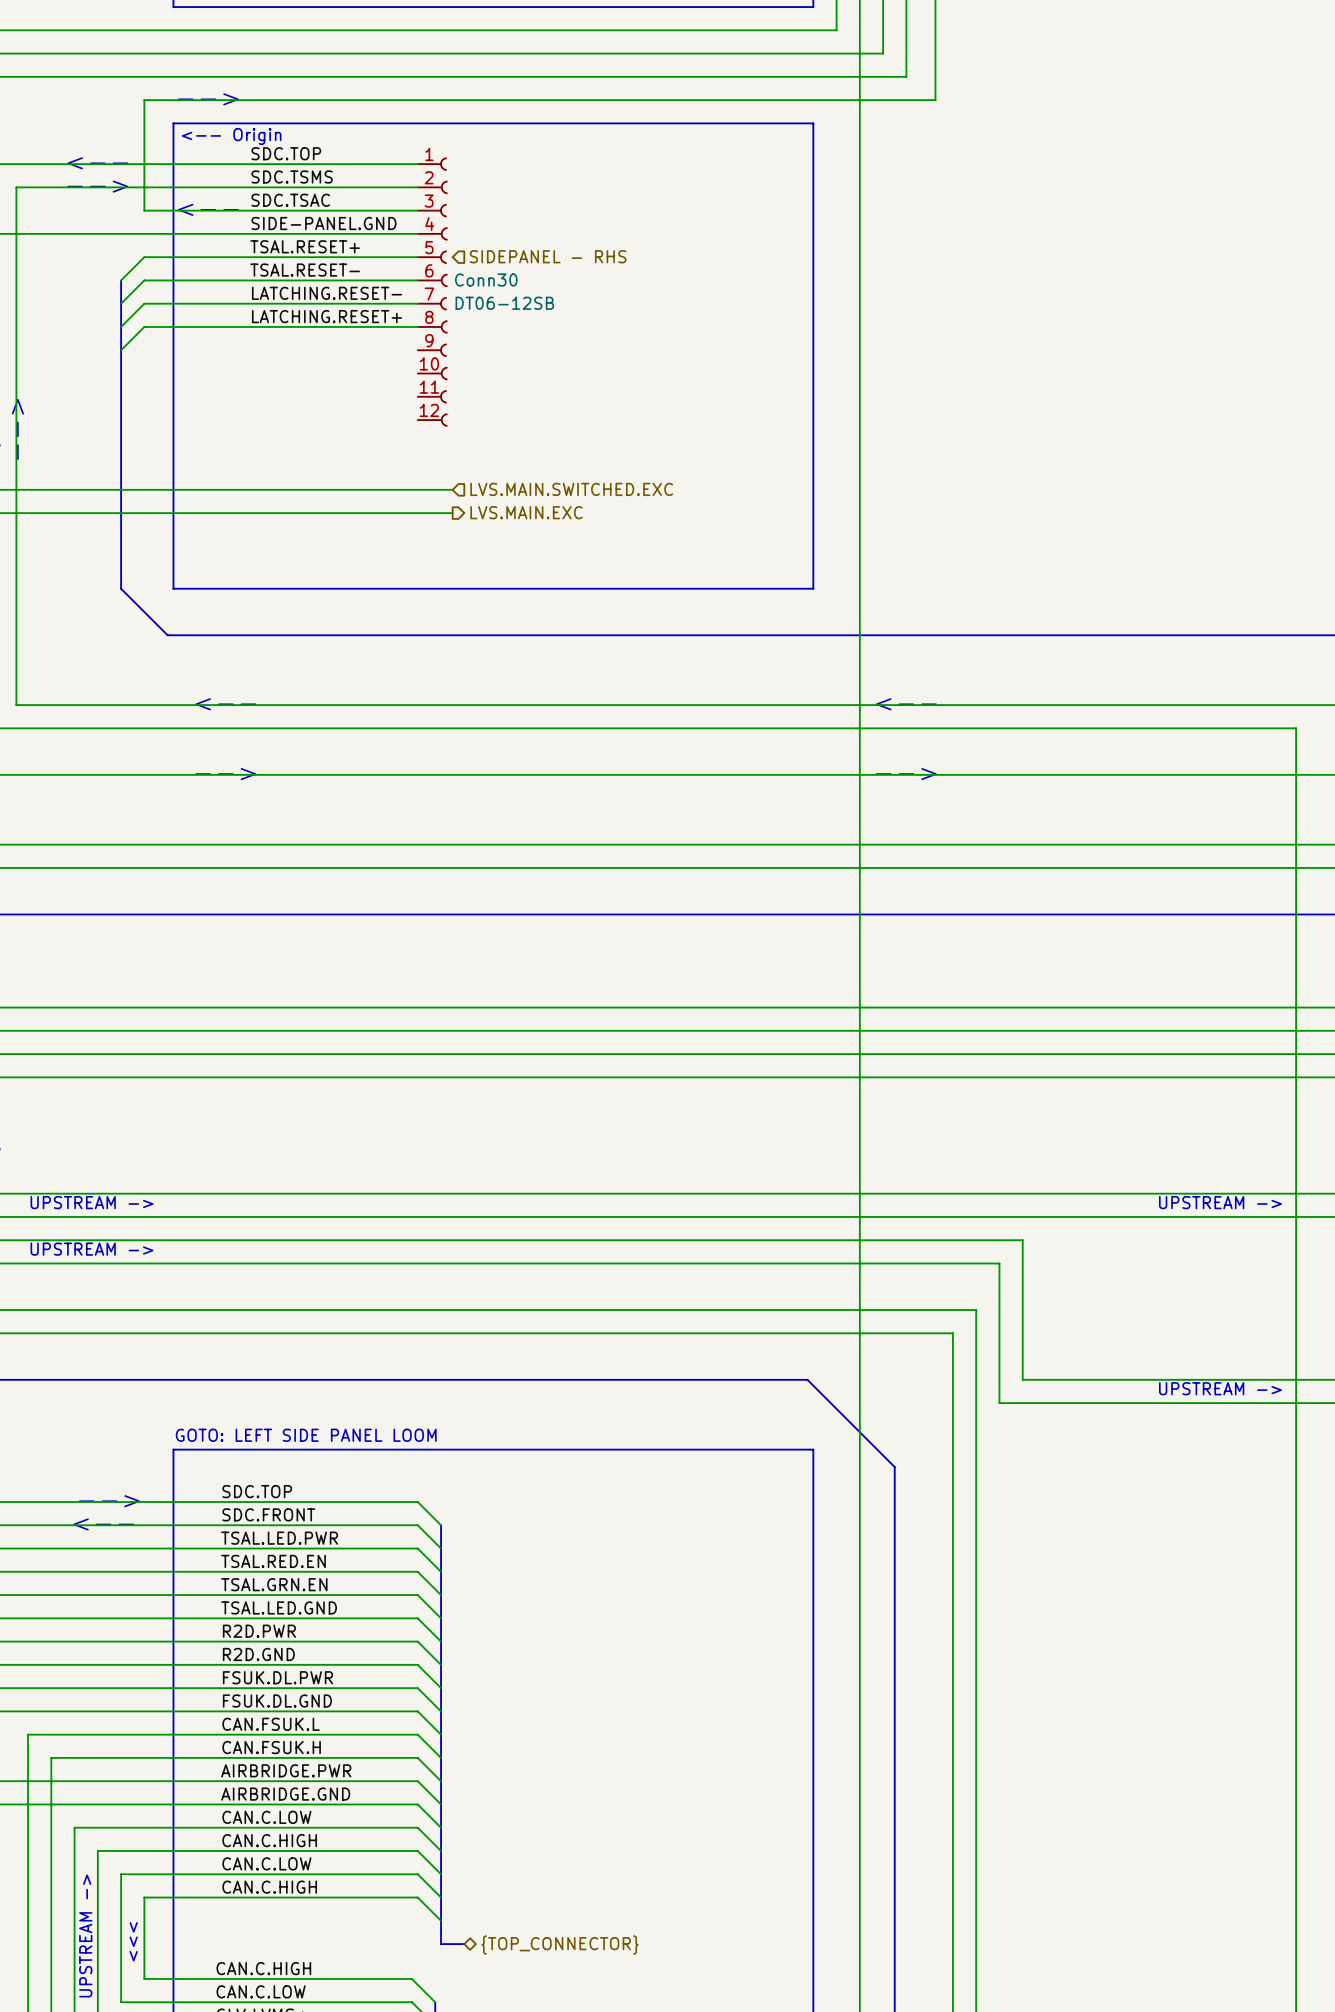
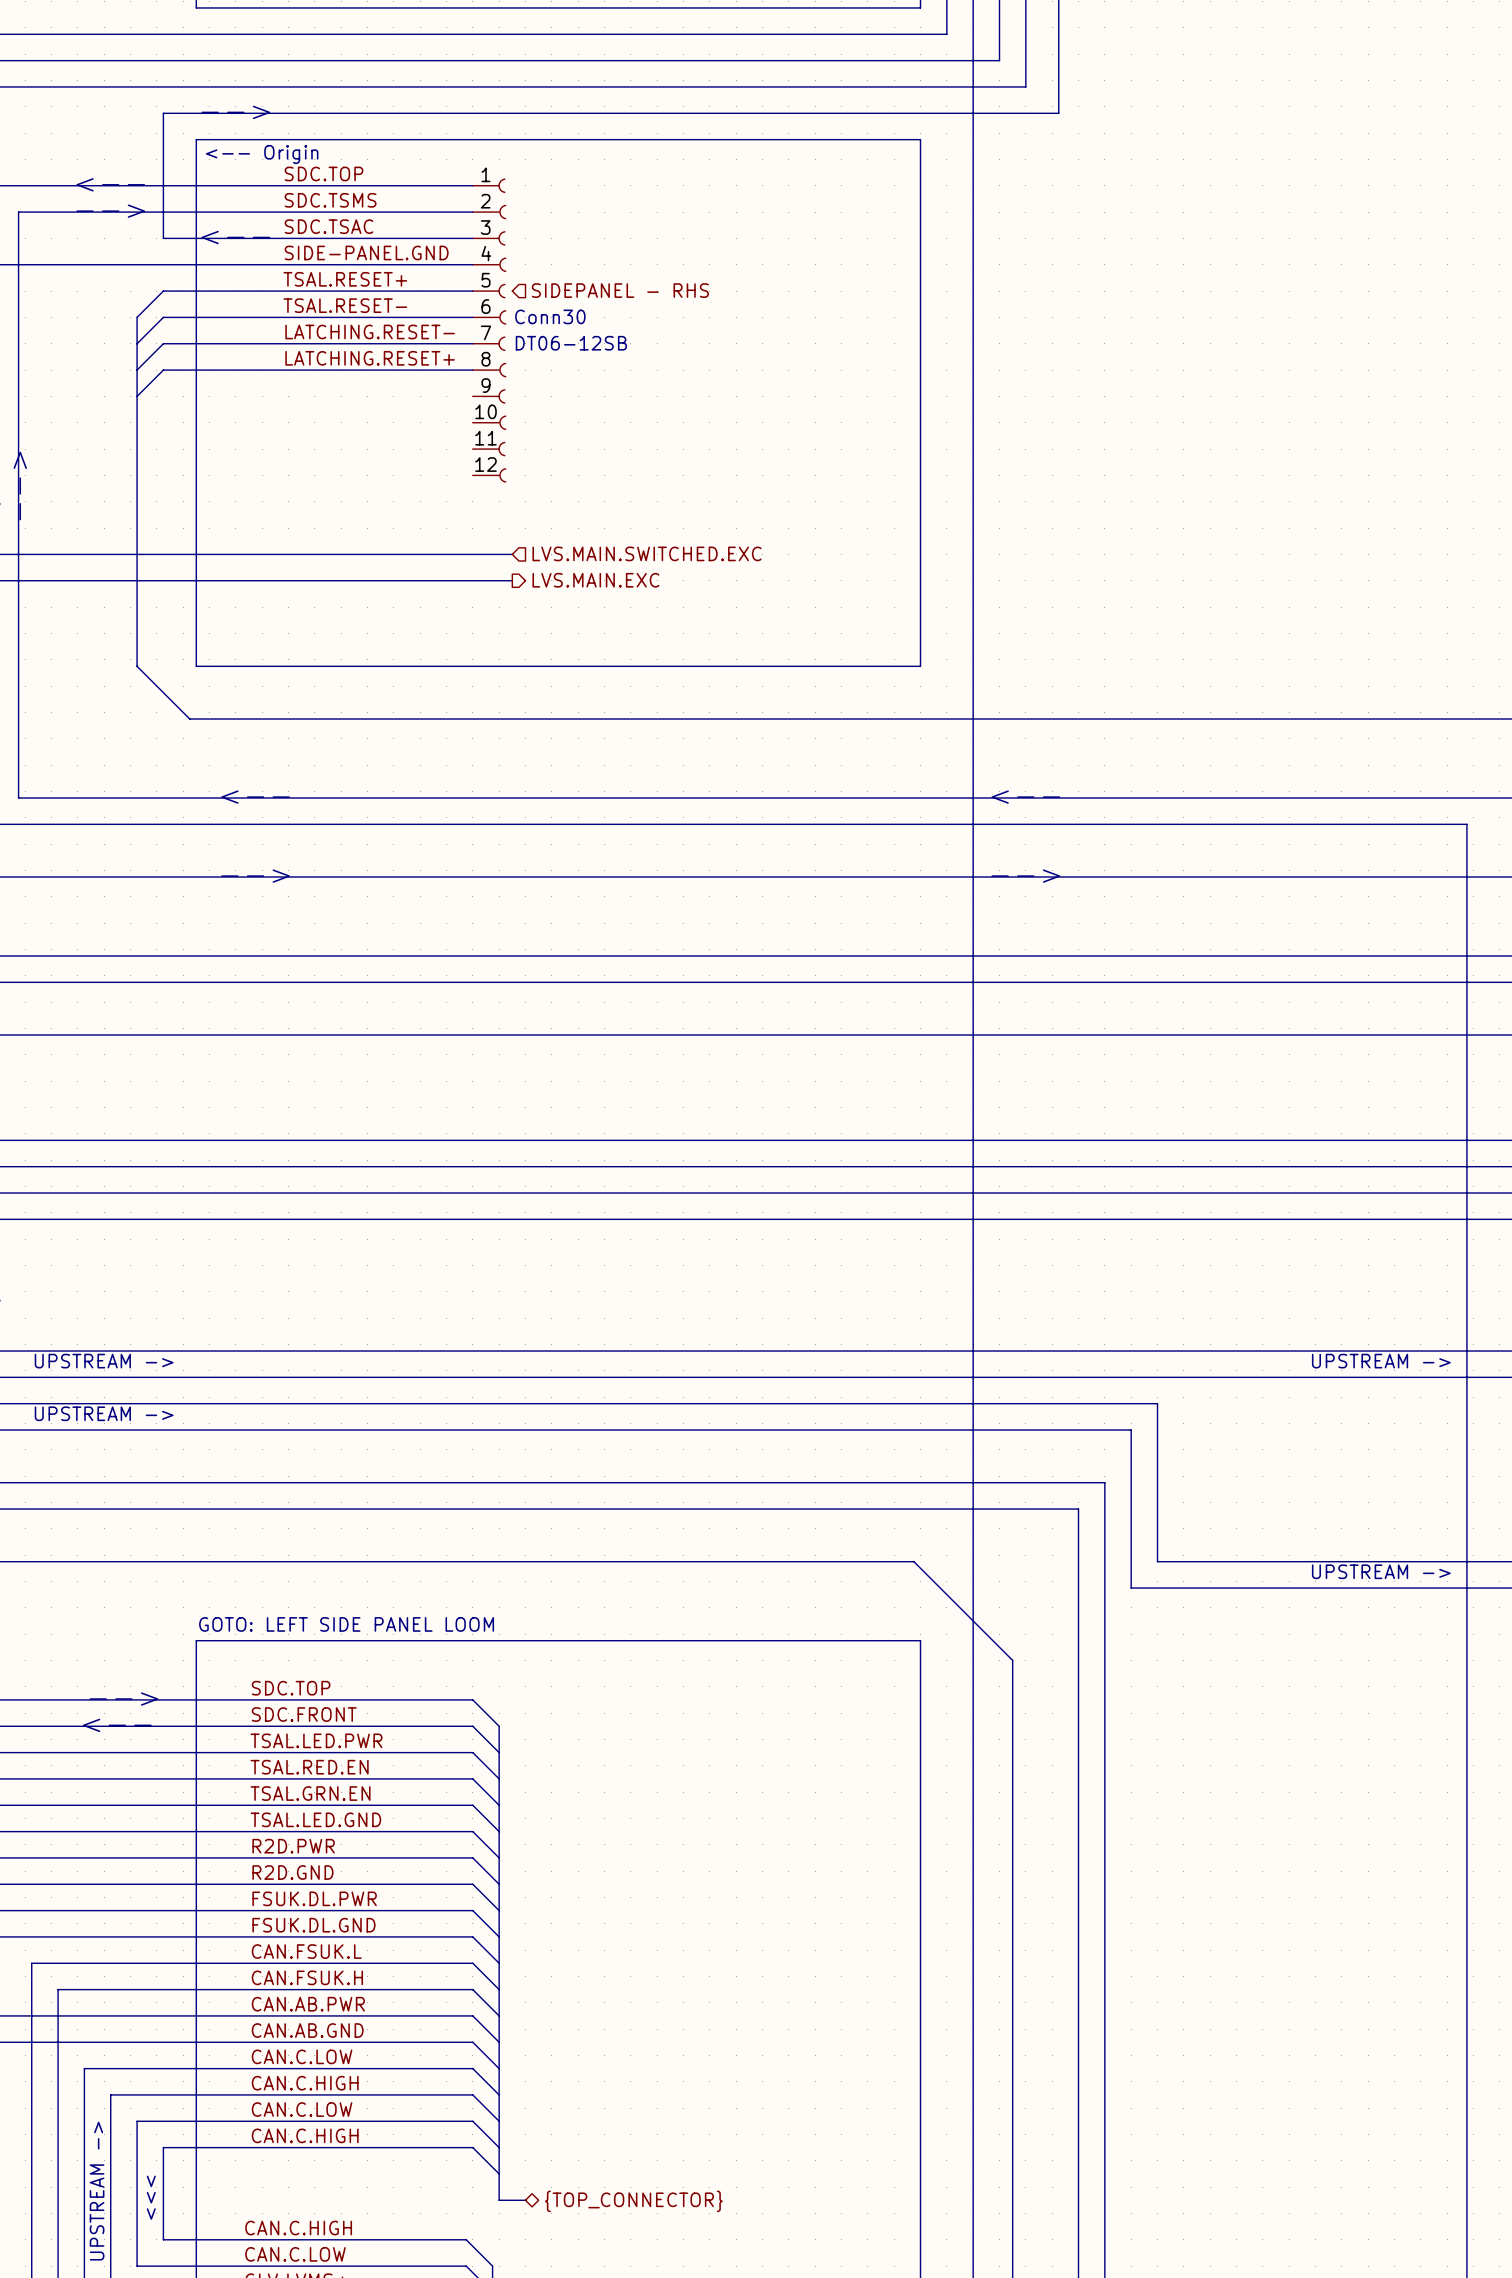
label: AIRBRIDGE.PWR (286, 1770) -> CAN.AB.PWR (308, 2004)
label: AIRBRIDGE.GND (285, 1794) -> CAN.AB.GND (307, 2030)

